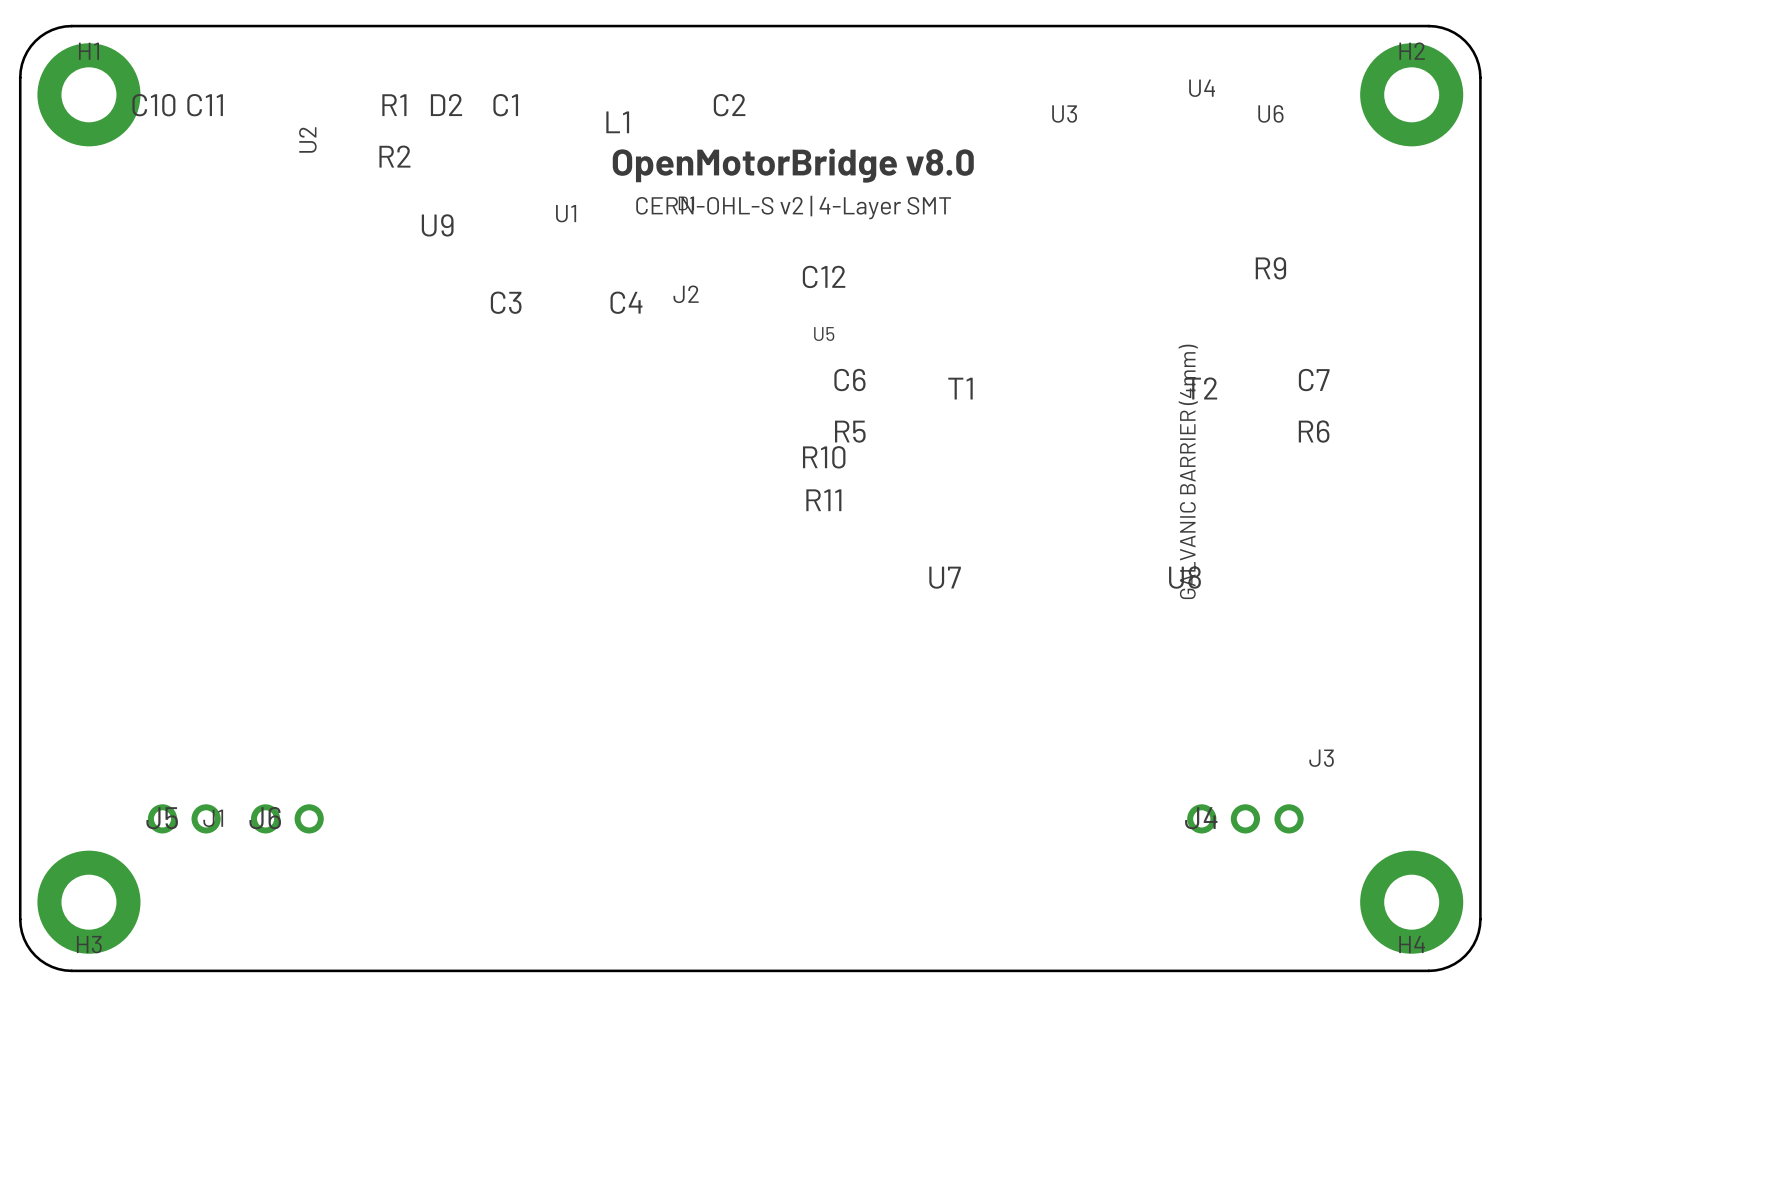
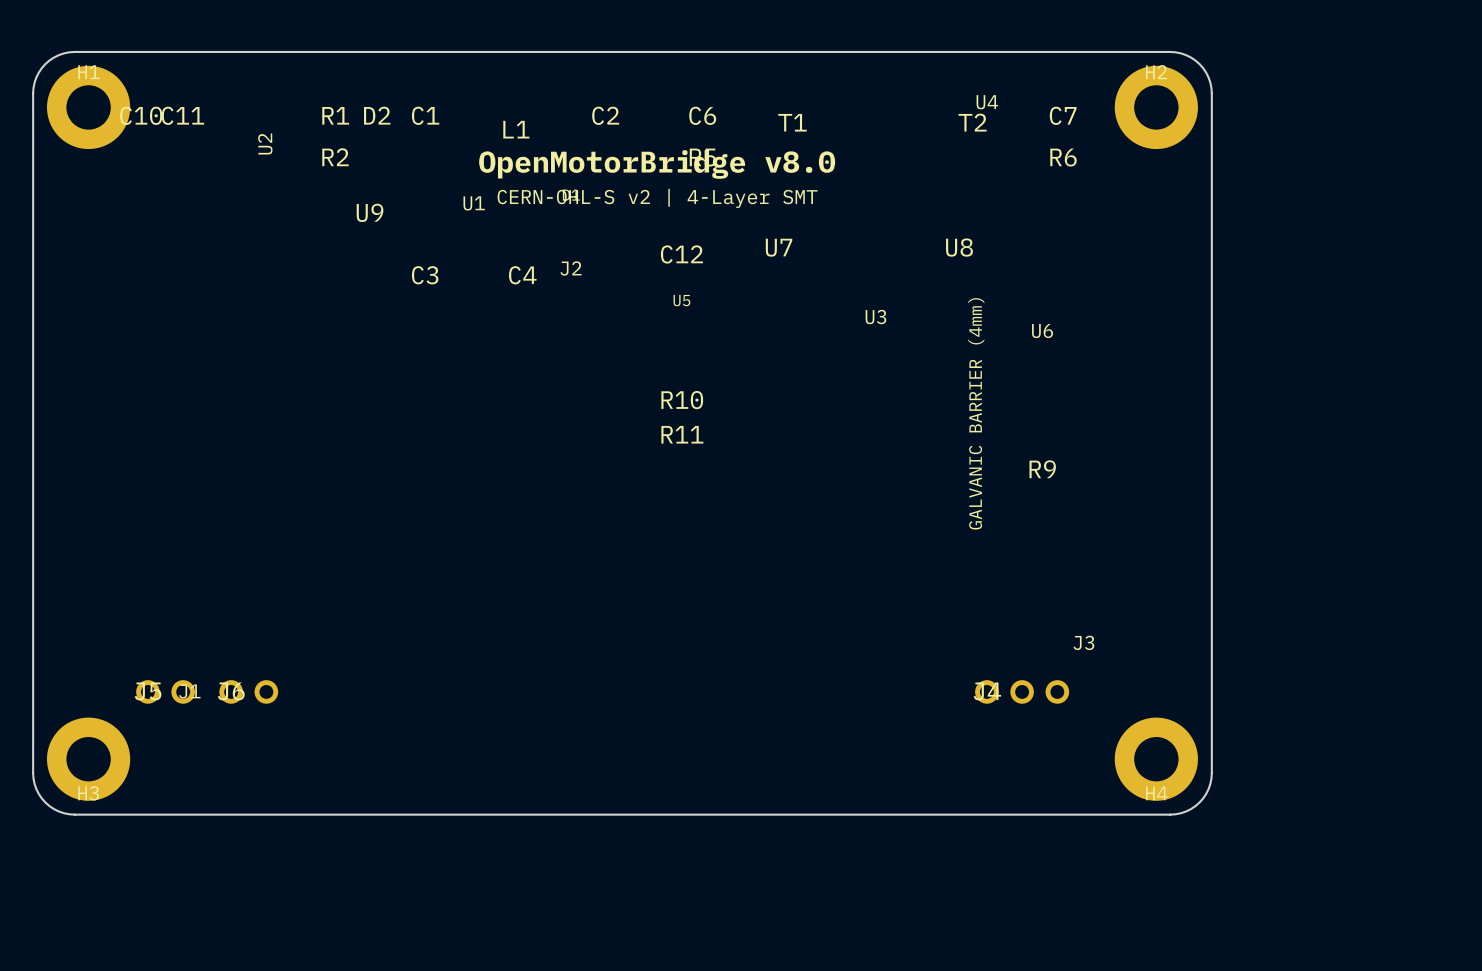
U6 position: (1270, 113) -> (1042, 331)
U3 position: (1064, 114) -> (875, 317)
R9 position: (1270, 268) -> (1042, 469)
C6 position: (849, 380) -> (702, 115)
C7 position: (1314, 380) -> (1063, 115)
T1 position: (960, 388) -> (792, 122)
T2 position: (1201, 388) -> (972, 122)
R5 position: (850, 431) -> (702, 157)
R6 position: (1314, 431) -> (1063, 157)
U7 position: (945, 577) -> (779, 247)
U8 position: (1184, 577) -> (959, 247)

